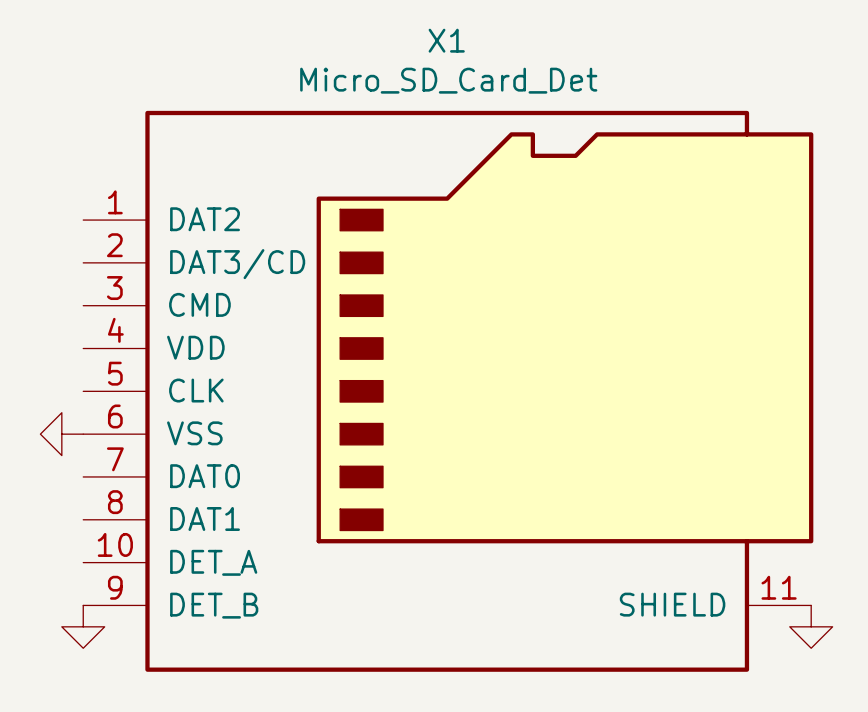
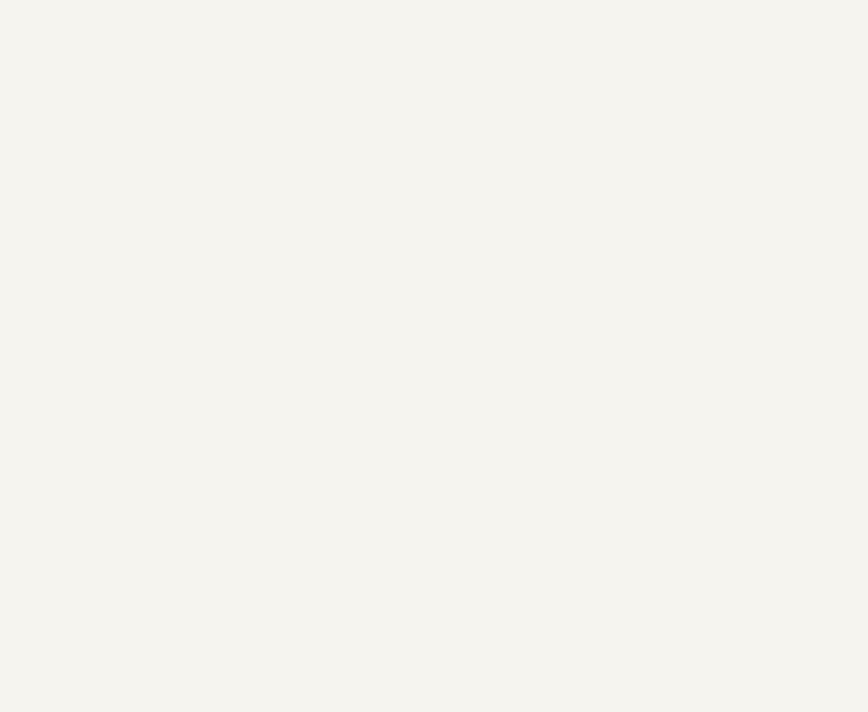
X1: Micro_SD_Card_Det (448, 391) -> none
power symbol: (61, 434) -> none
power symbol: (83, 626) -> none
power symbol: (811, 626) -> none

